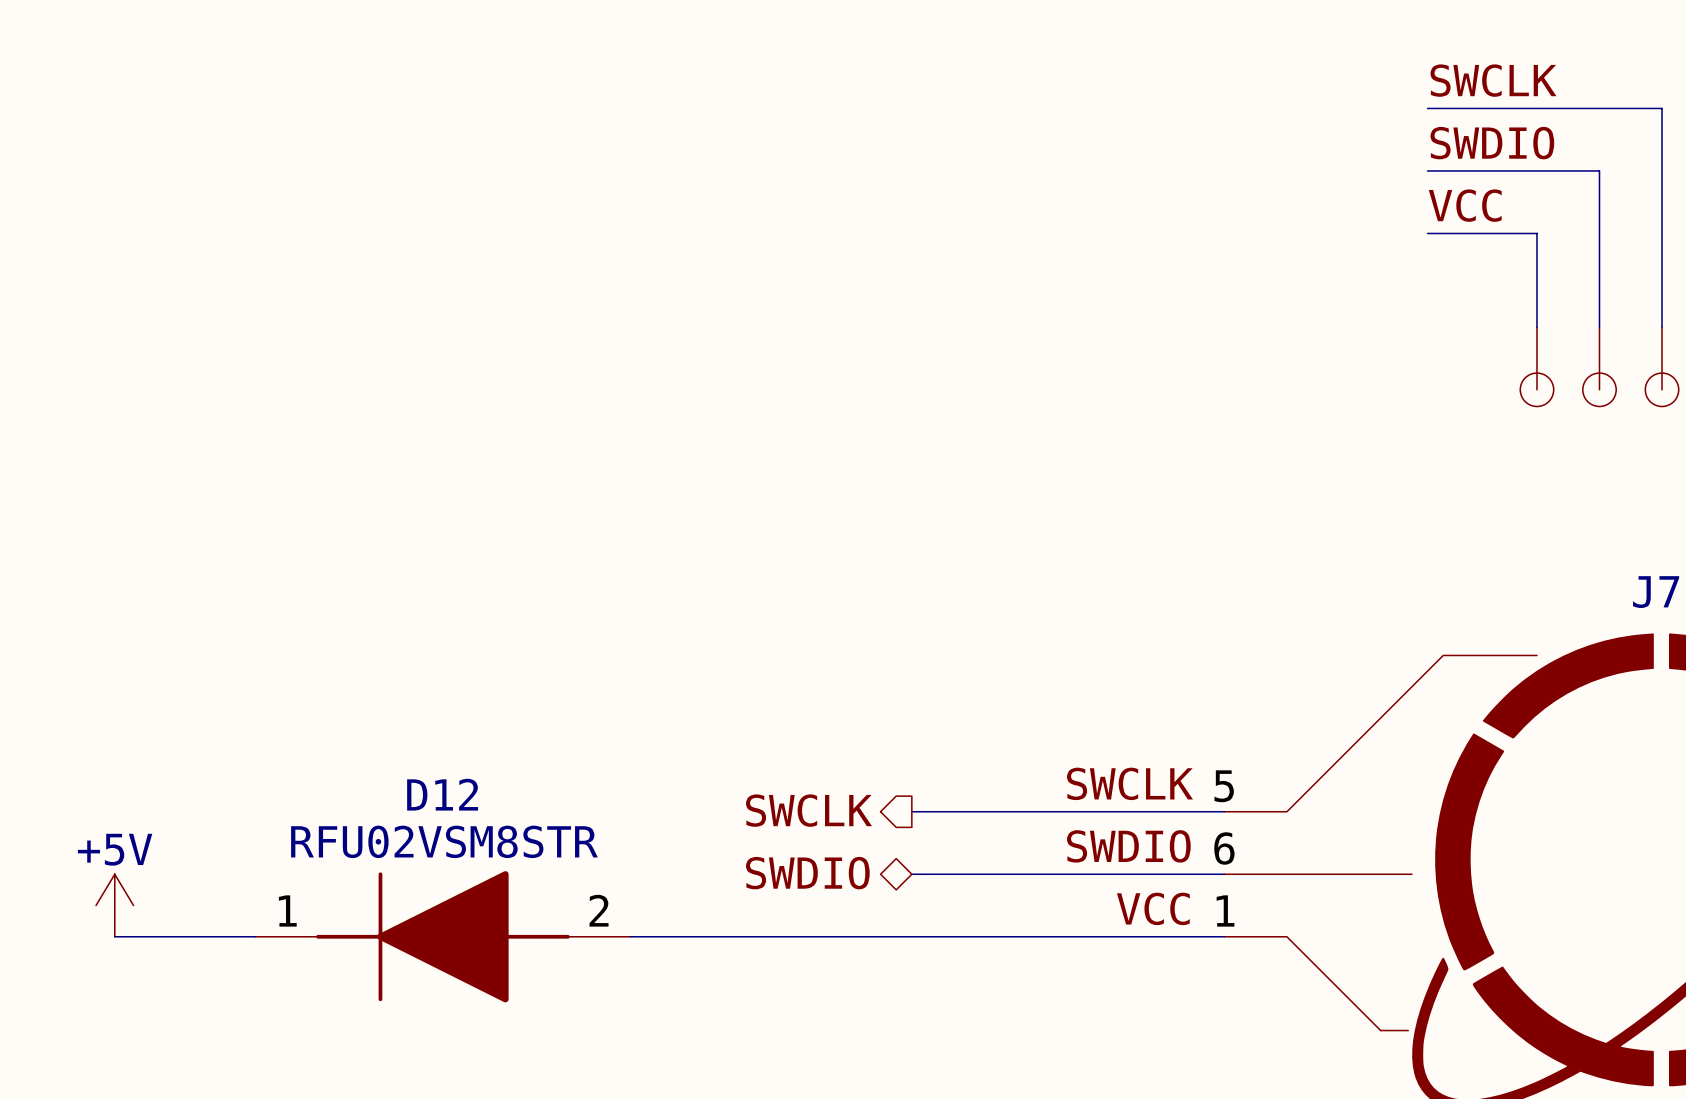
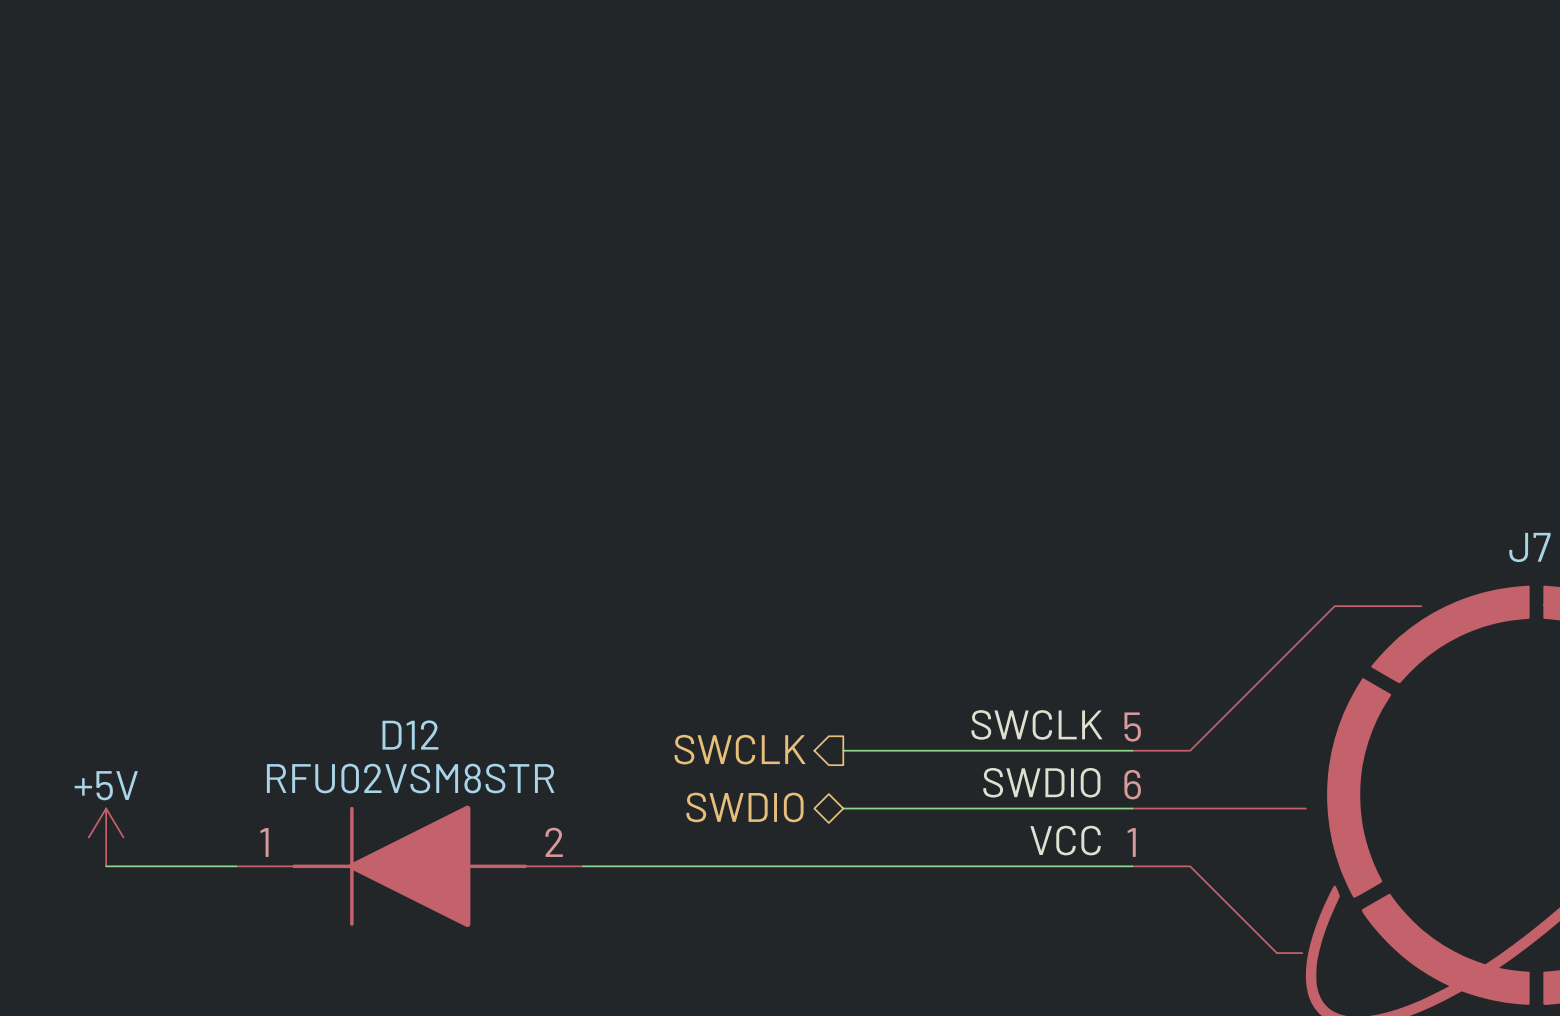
label: SWCLK (1493, 80) -> none
wire: (1427, 108) (1662, 108) (1662, 327) -> none
label: SWDIO (1492, 143) -> none
wire: (1427, 170) (1599, 170) (1599, 327) -> none
label: VCC (1465, 205) -> none
wire: (1427, 233) (1536, 233) (1536, 327) -> none
part: (1536, 366) -> none
part: (1599, 366) -> none
part: (1662, 366) -> none

